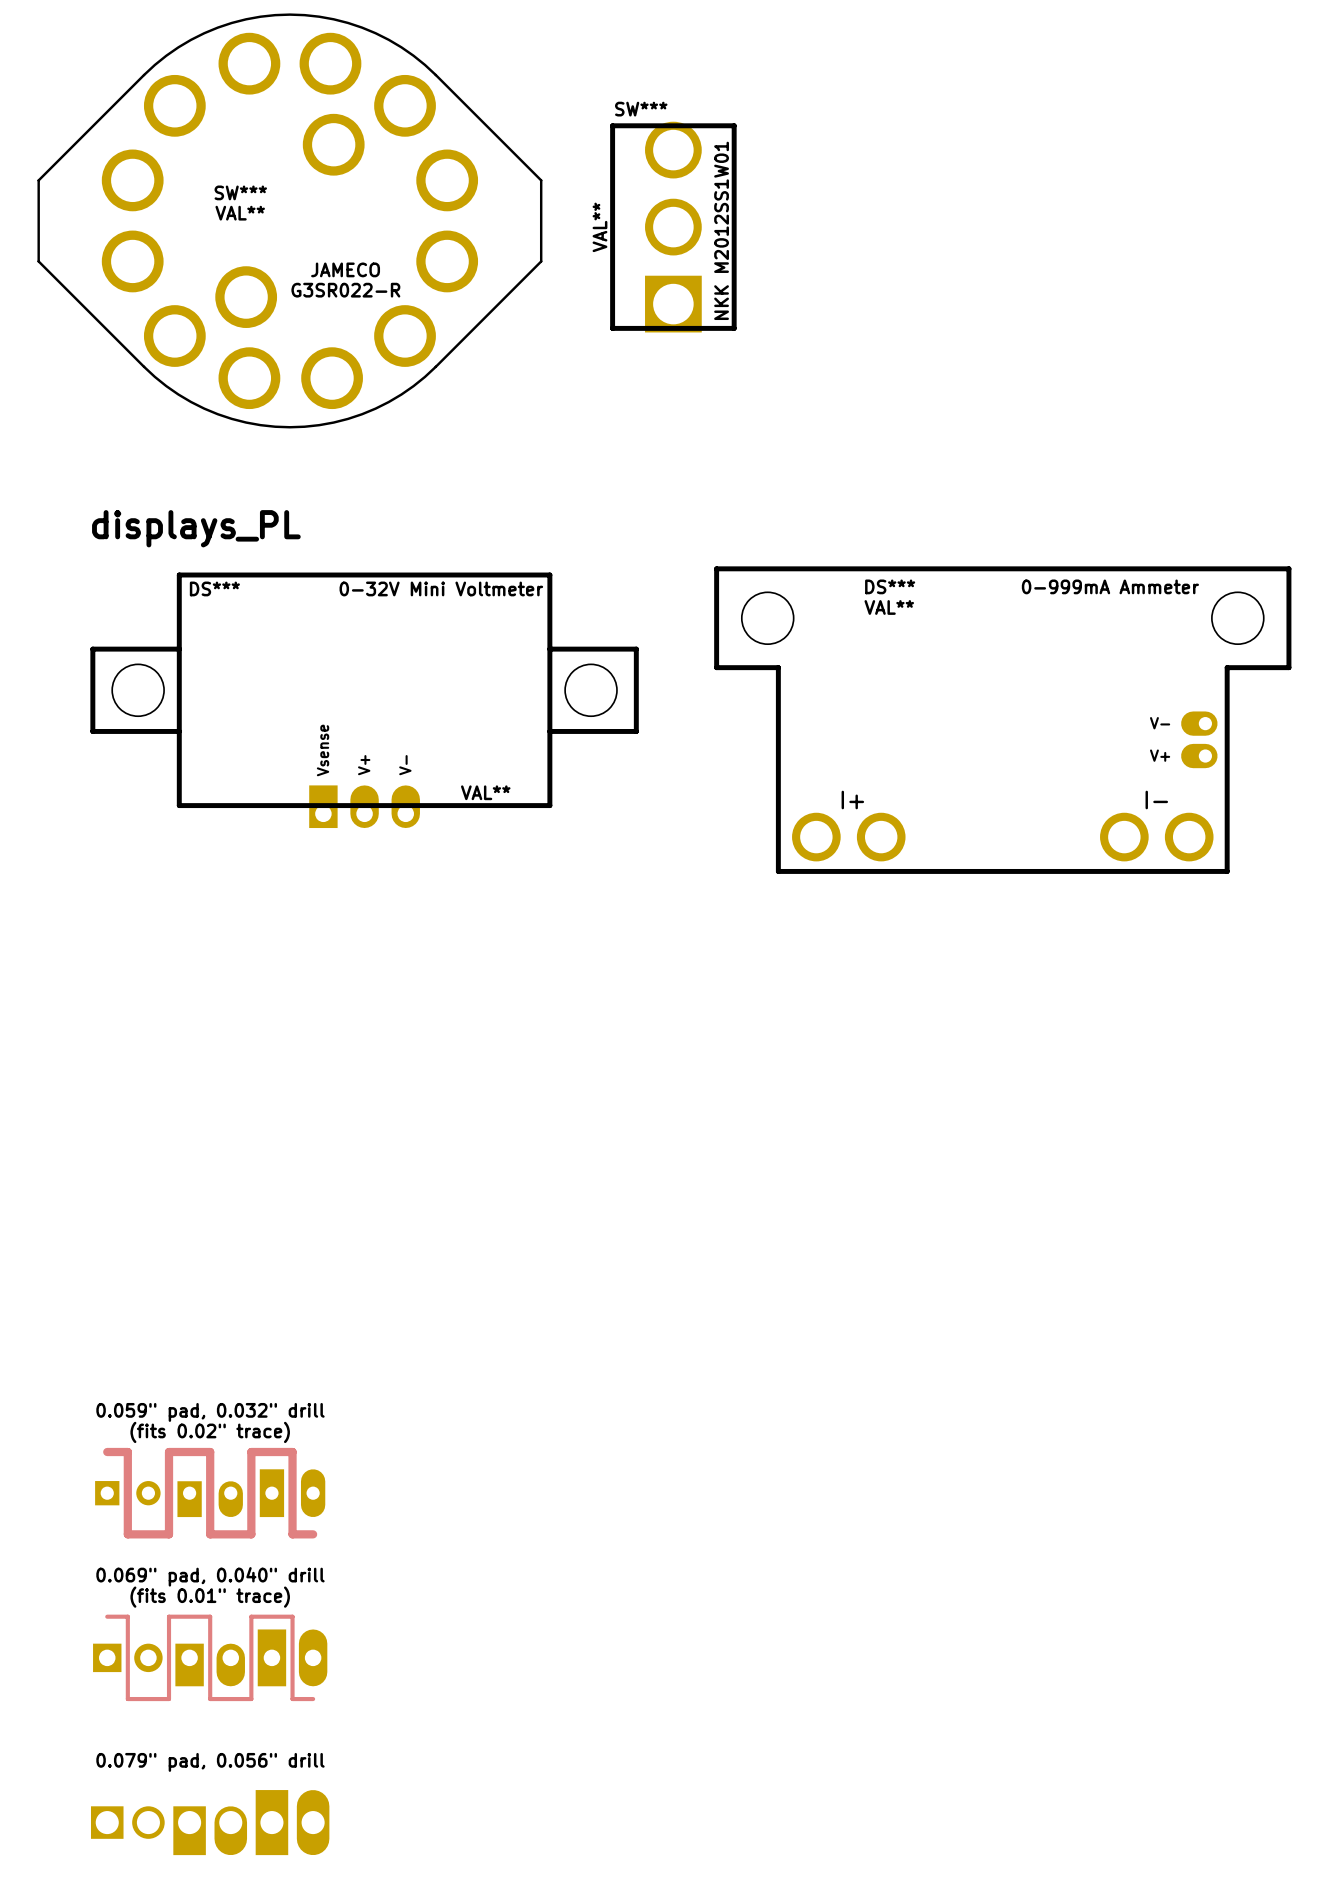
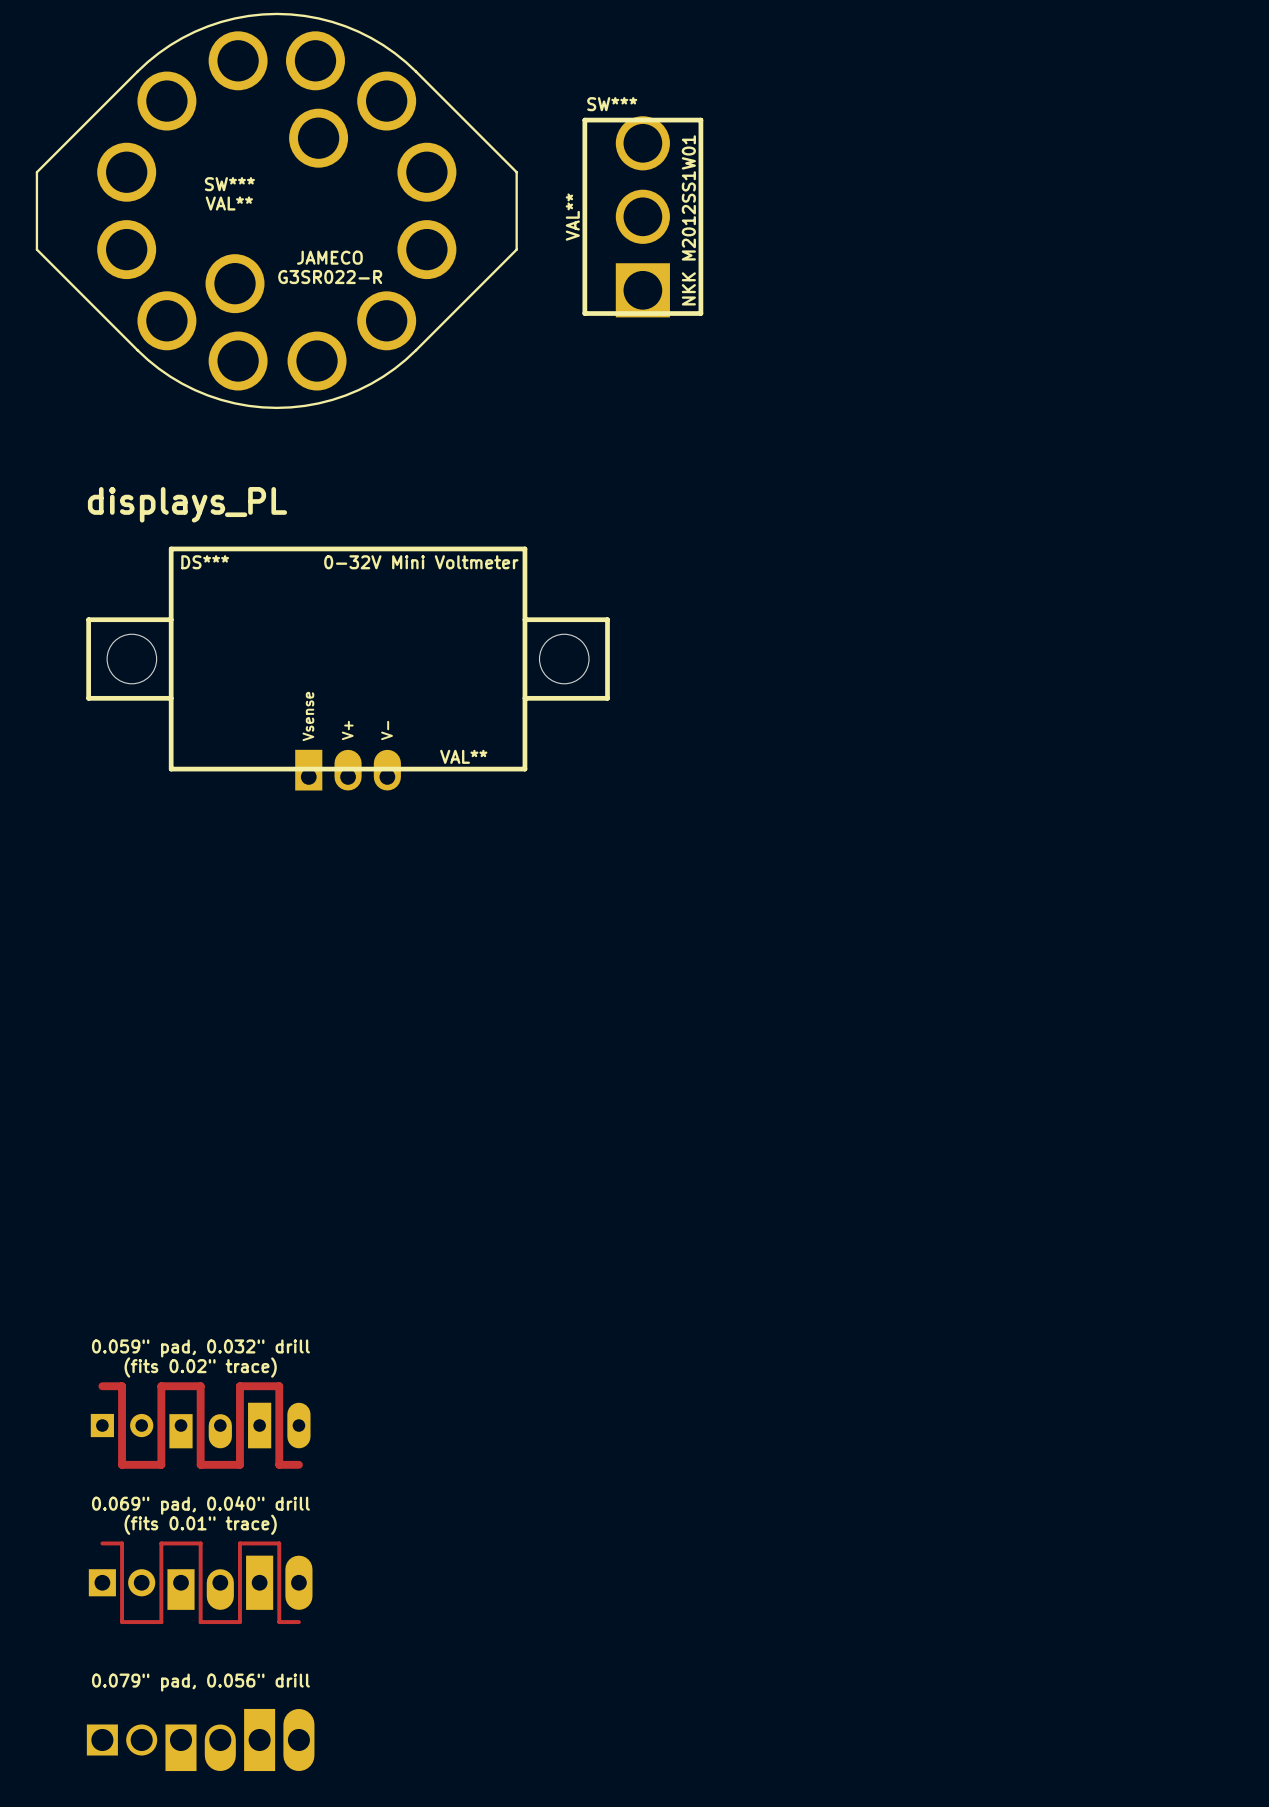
DS***: VAL** (1002, 720) -> none

